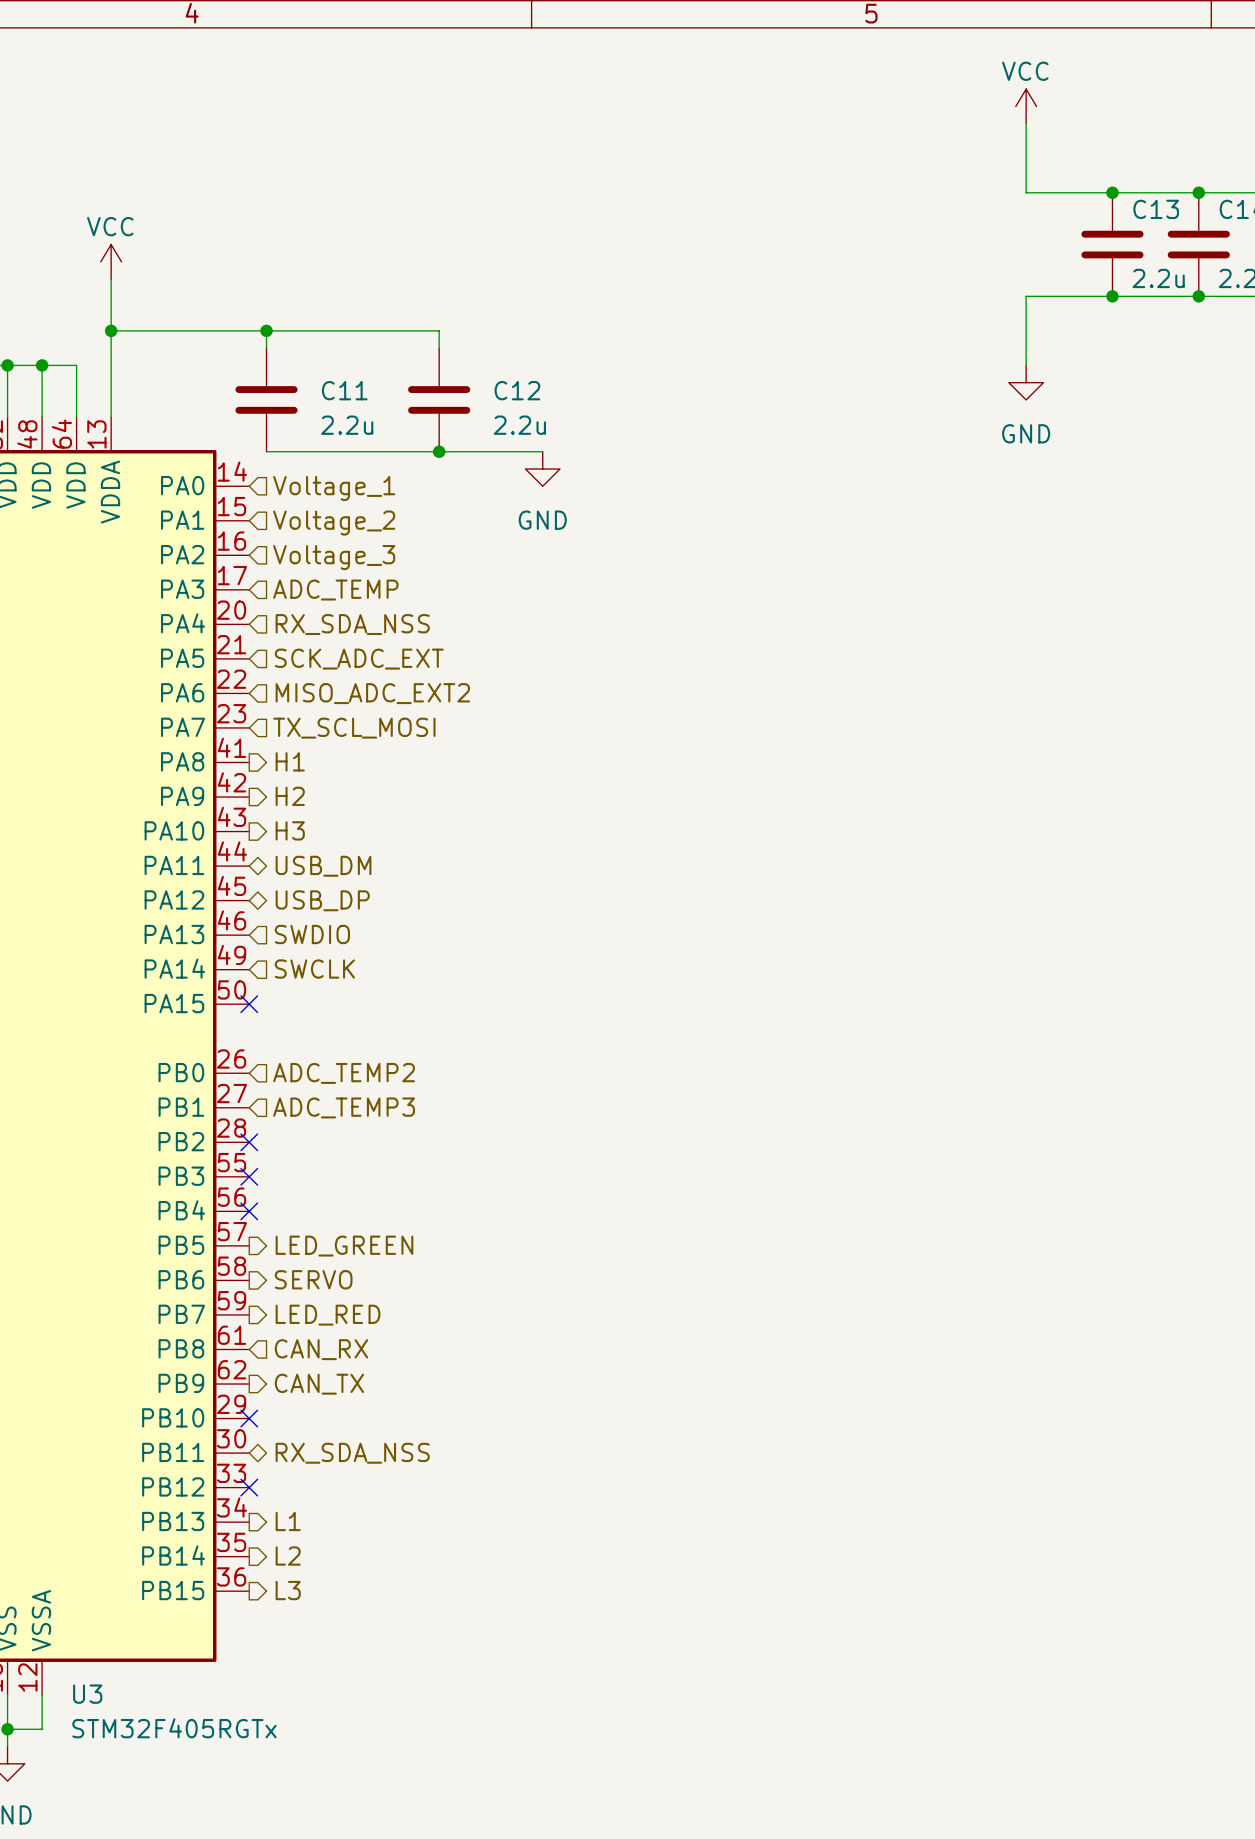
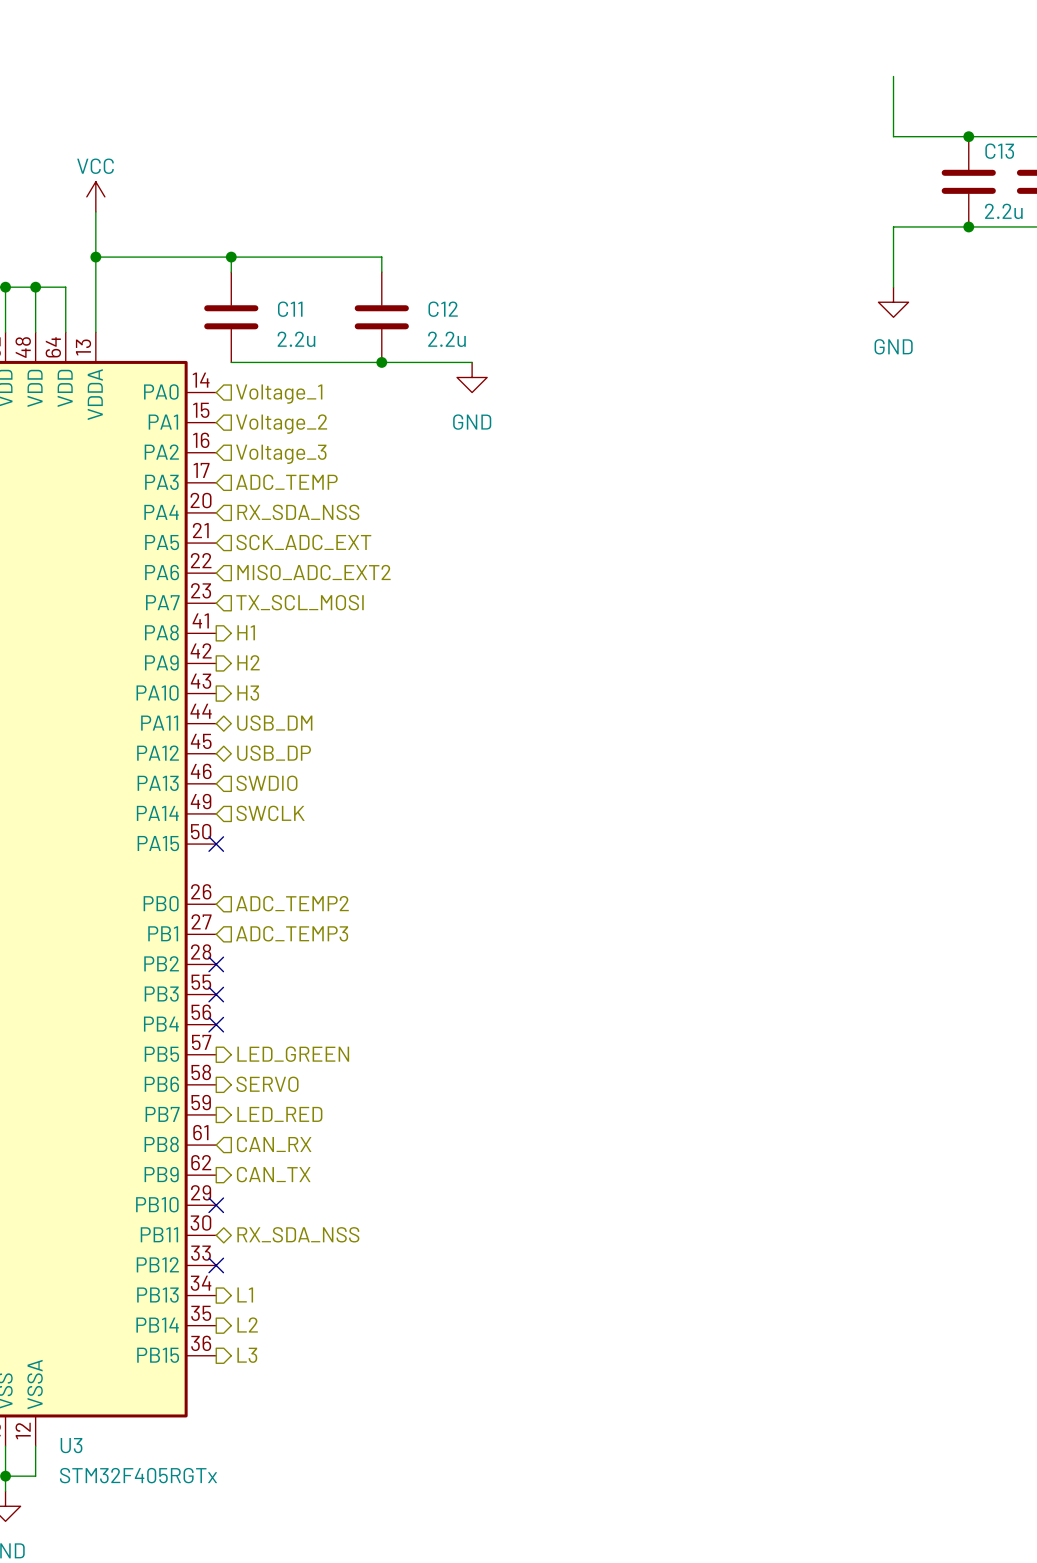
power symbol: VCC (1026, 106) -> none

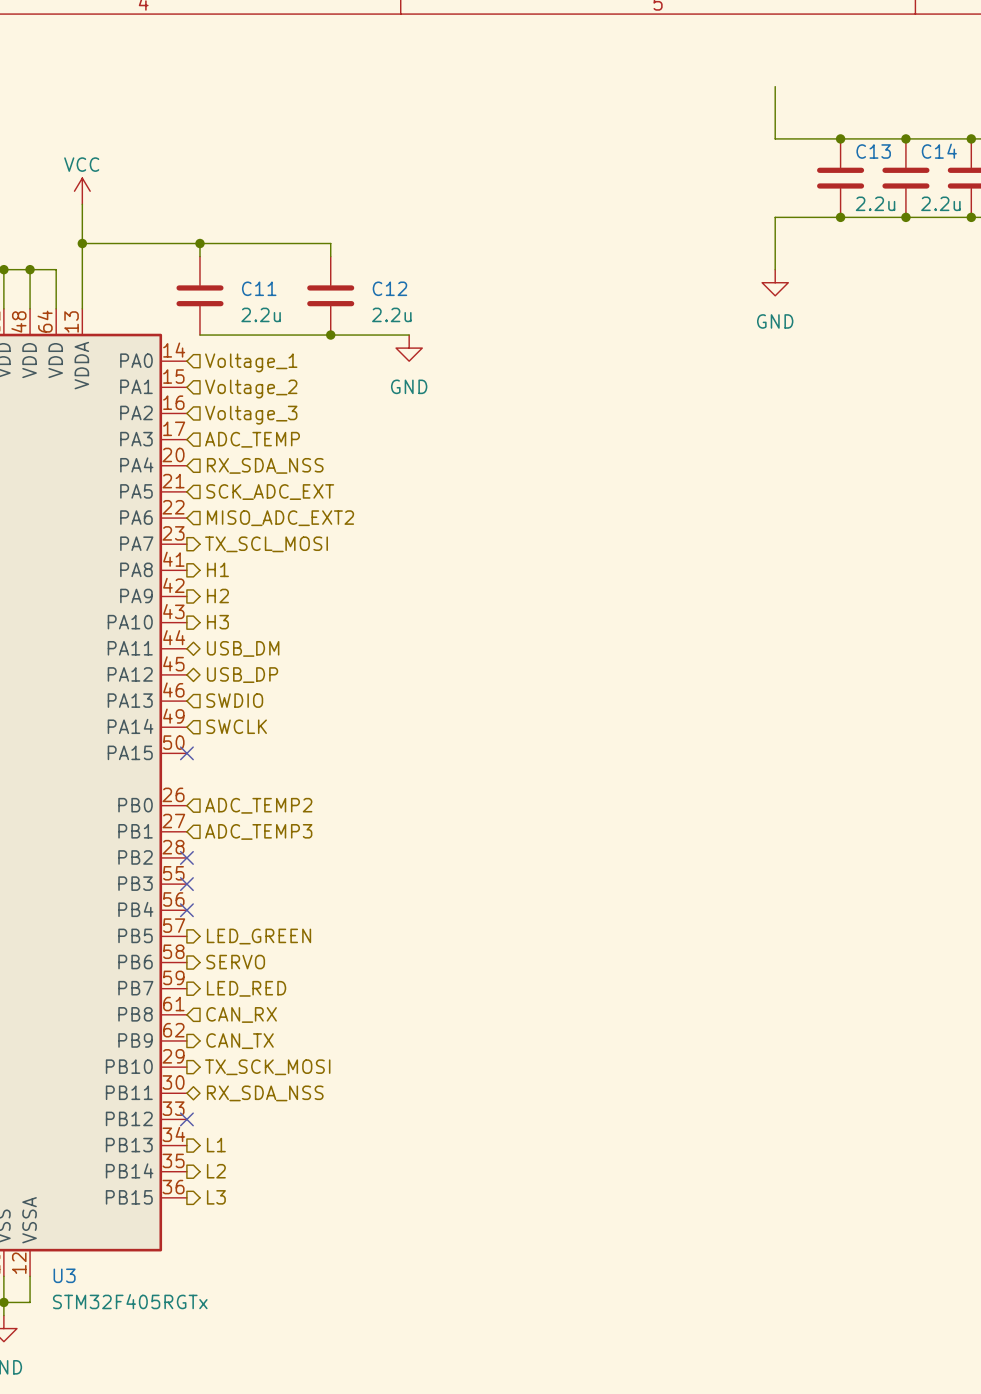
hierarchical label shape: input (300, 602) -> output (266, 544)
hierarchical label: none -> TX_SCK_MOSI (267, 1067)
no-connect mark: (216, 1205) -> none

